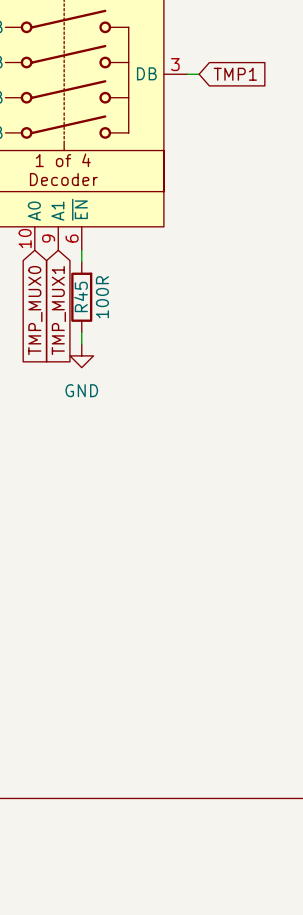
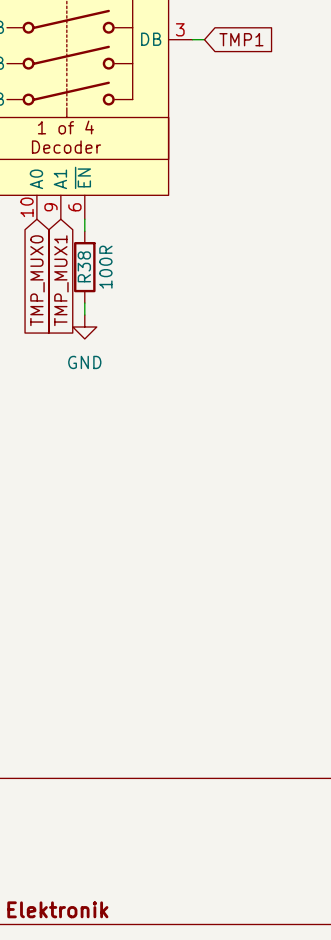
R45 name: R45 (81, 296) -> R38 (84, 266)

